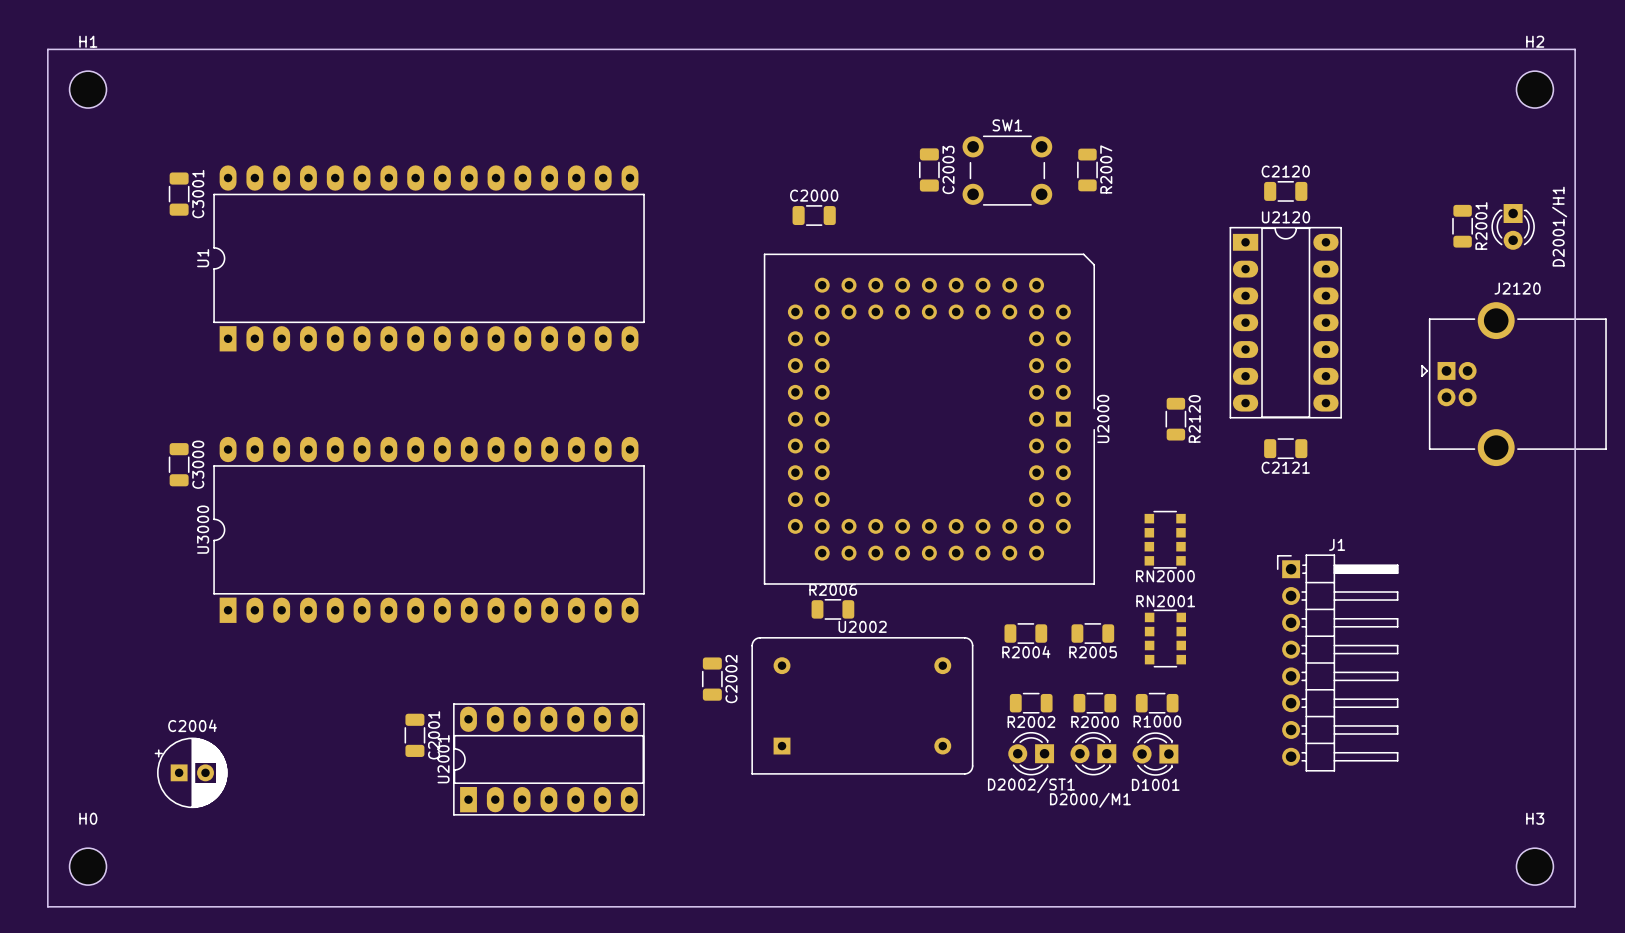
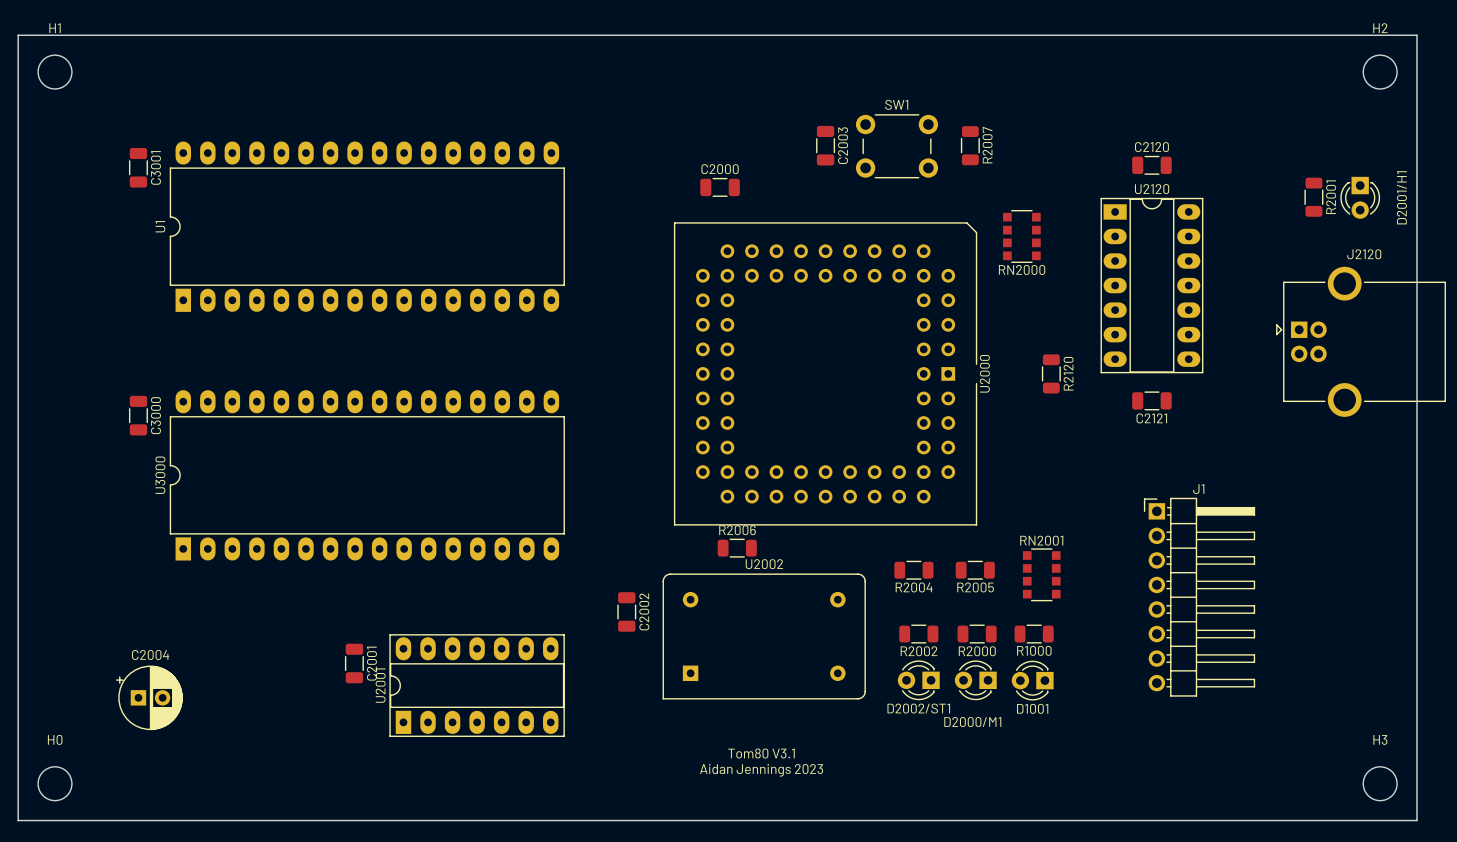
RN2000 position: (1165, 539) -> (1021, 236)
text: none -> Tom80 V3.1 (761, 753)
text: none -> Aidan Jennings 2023 (761, 770)

